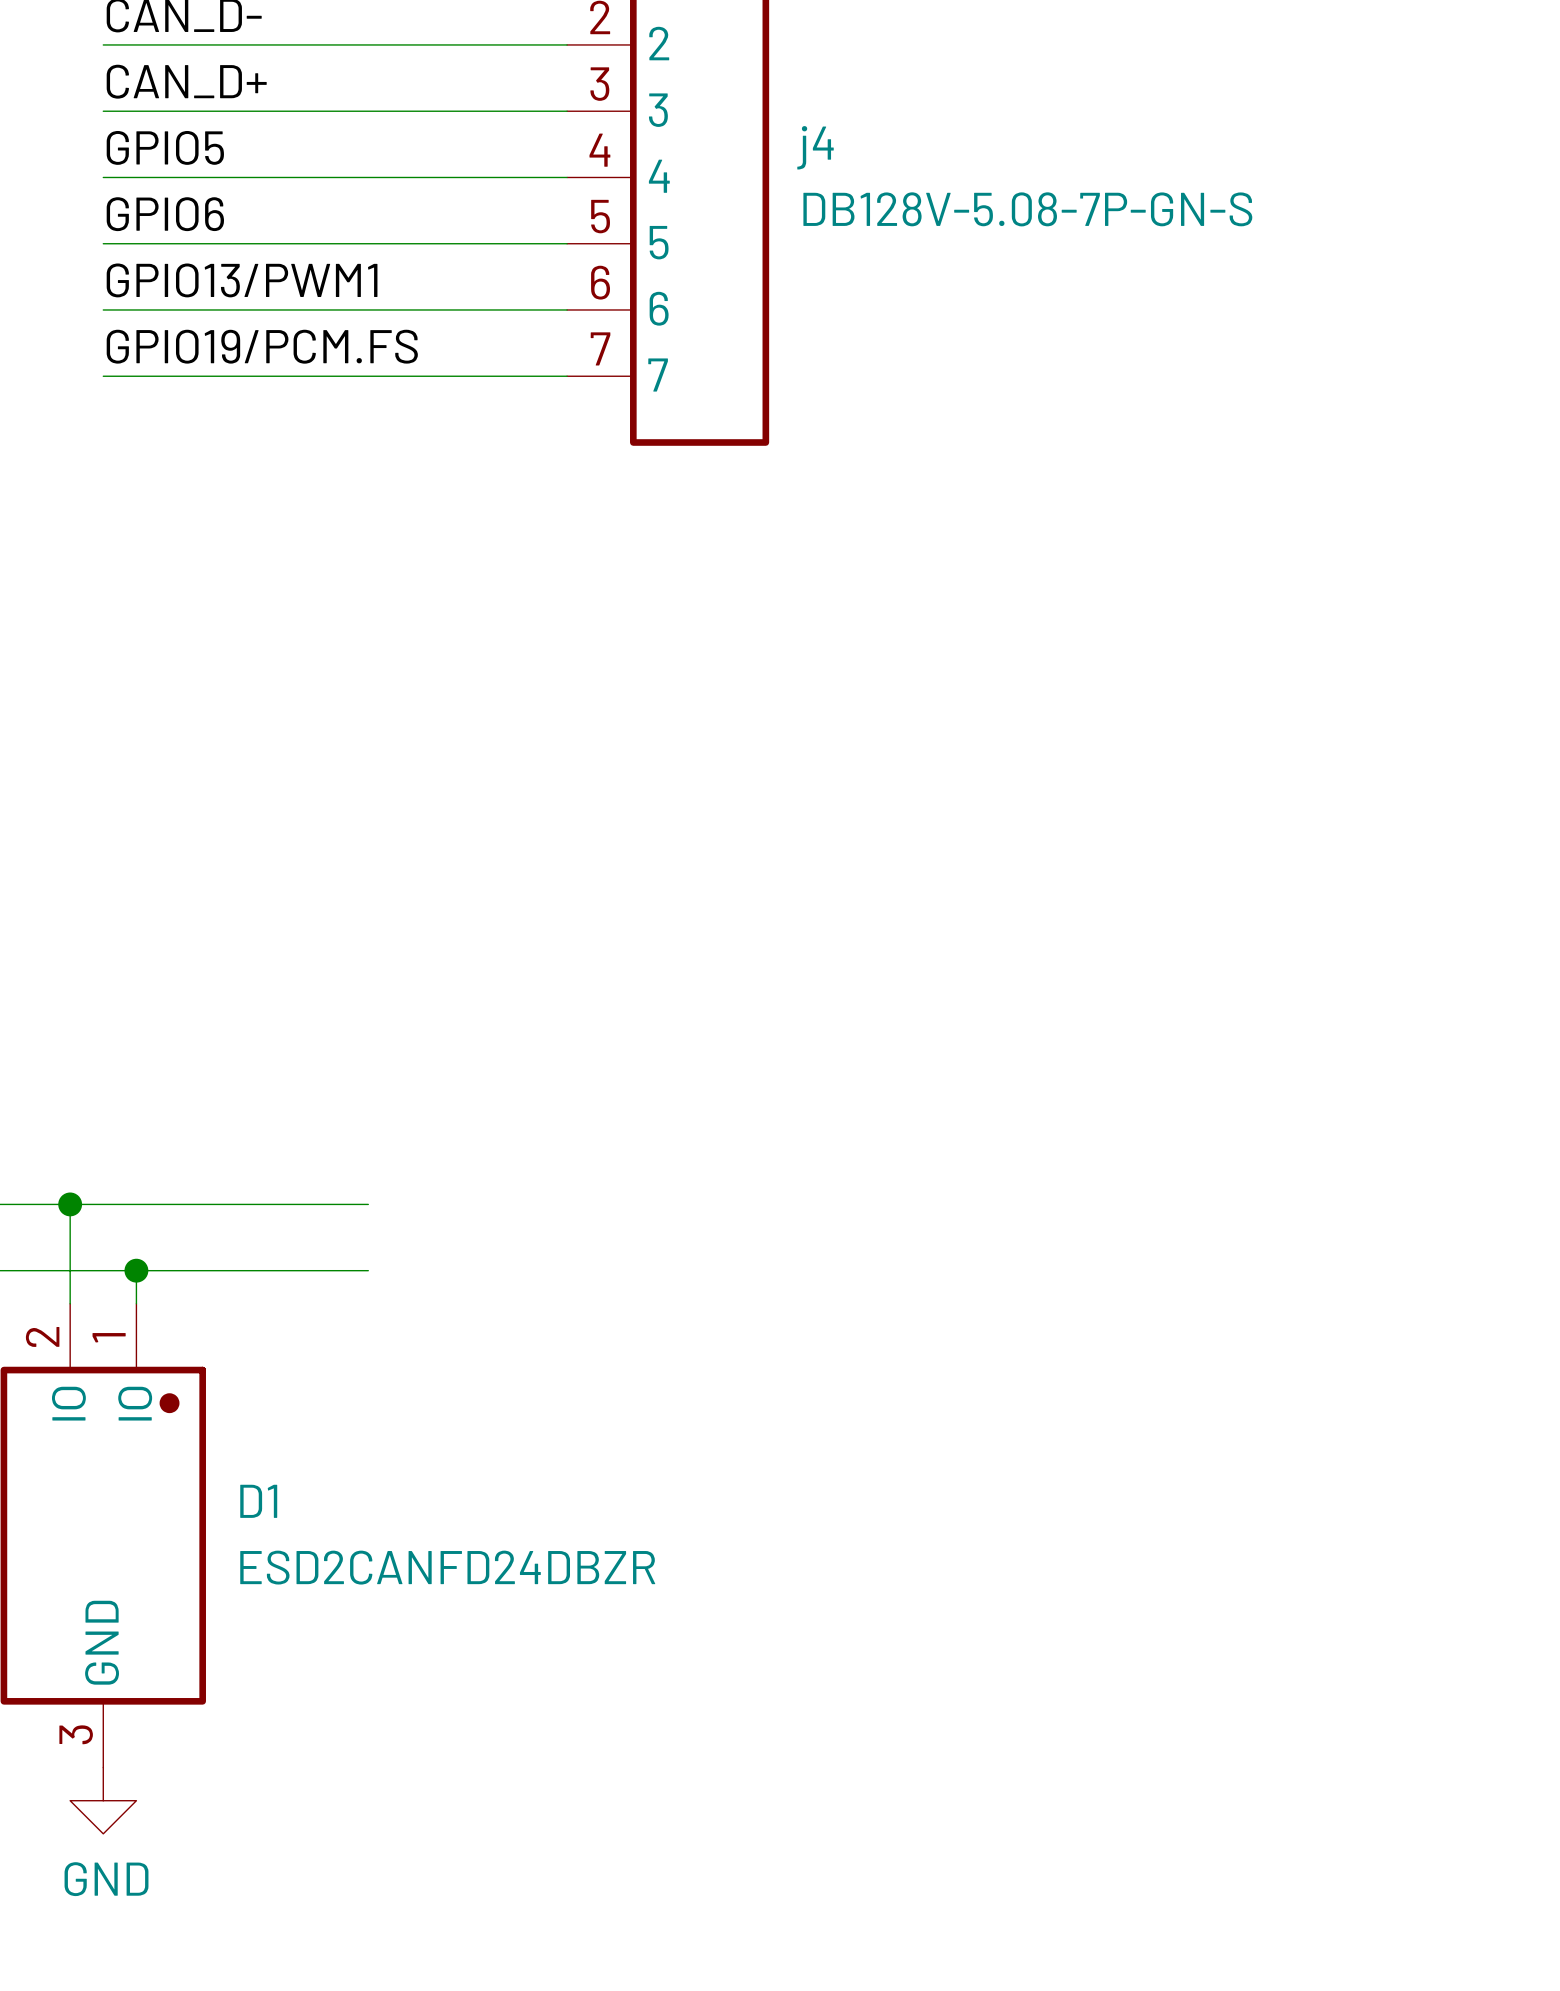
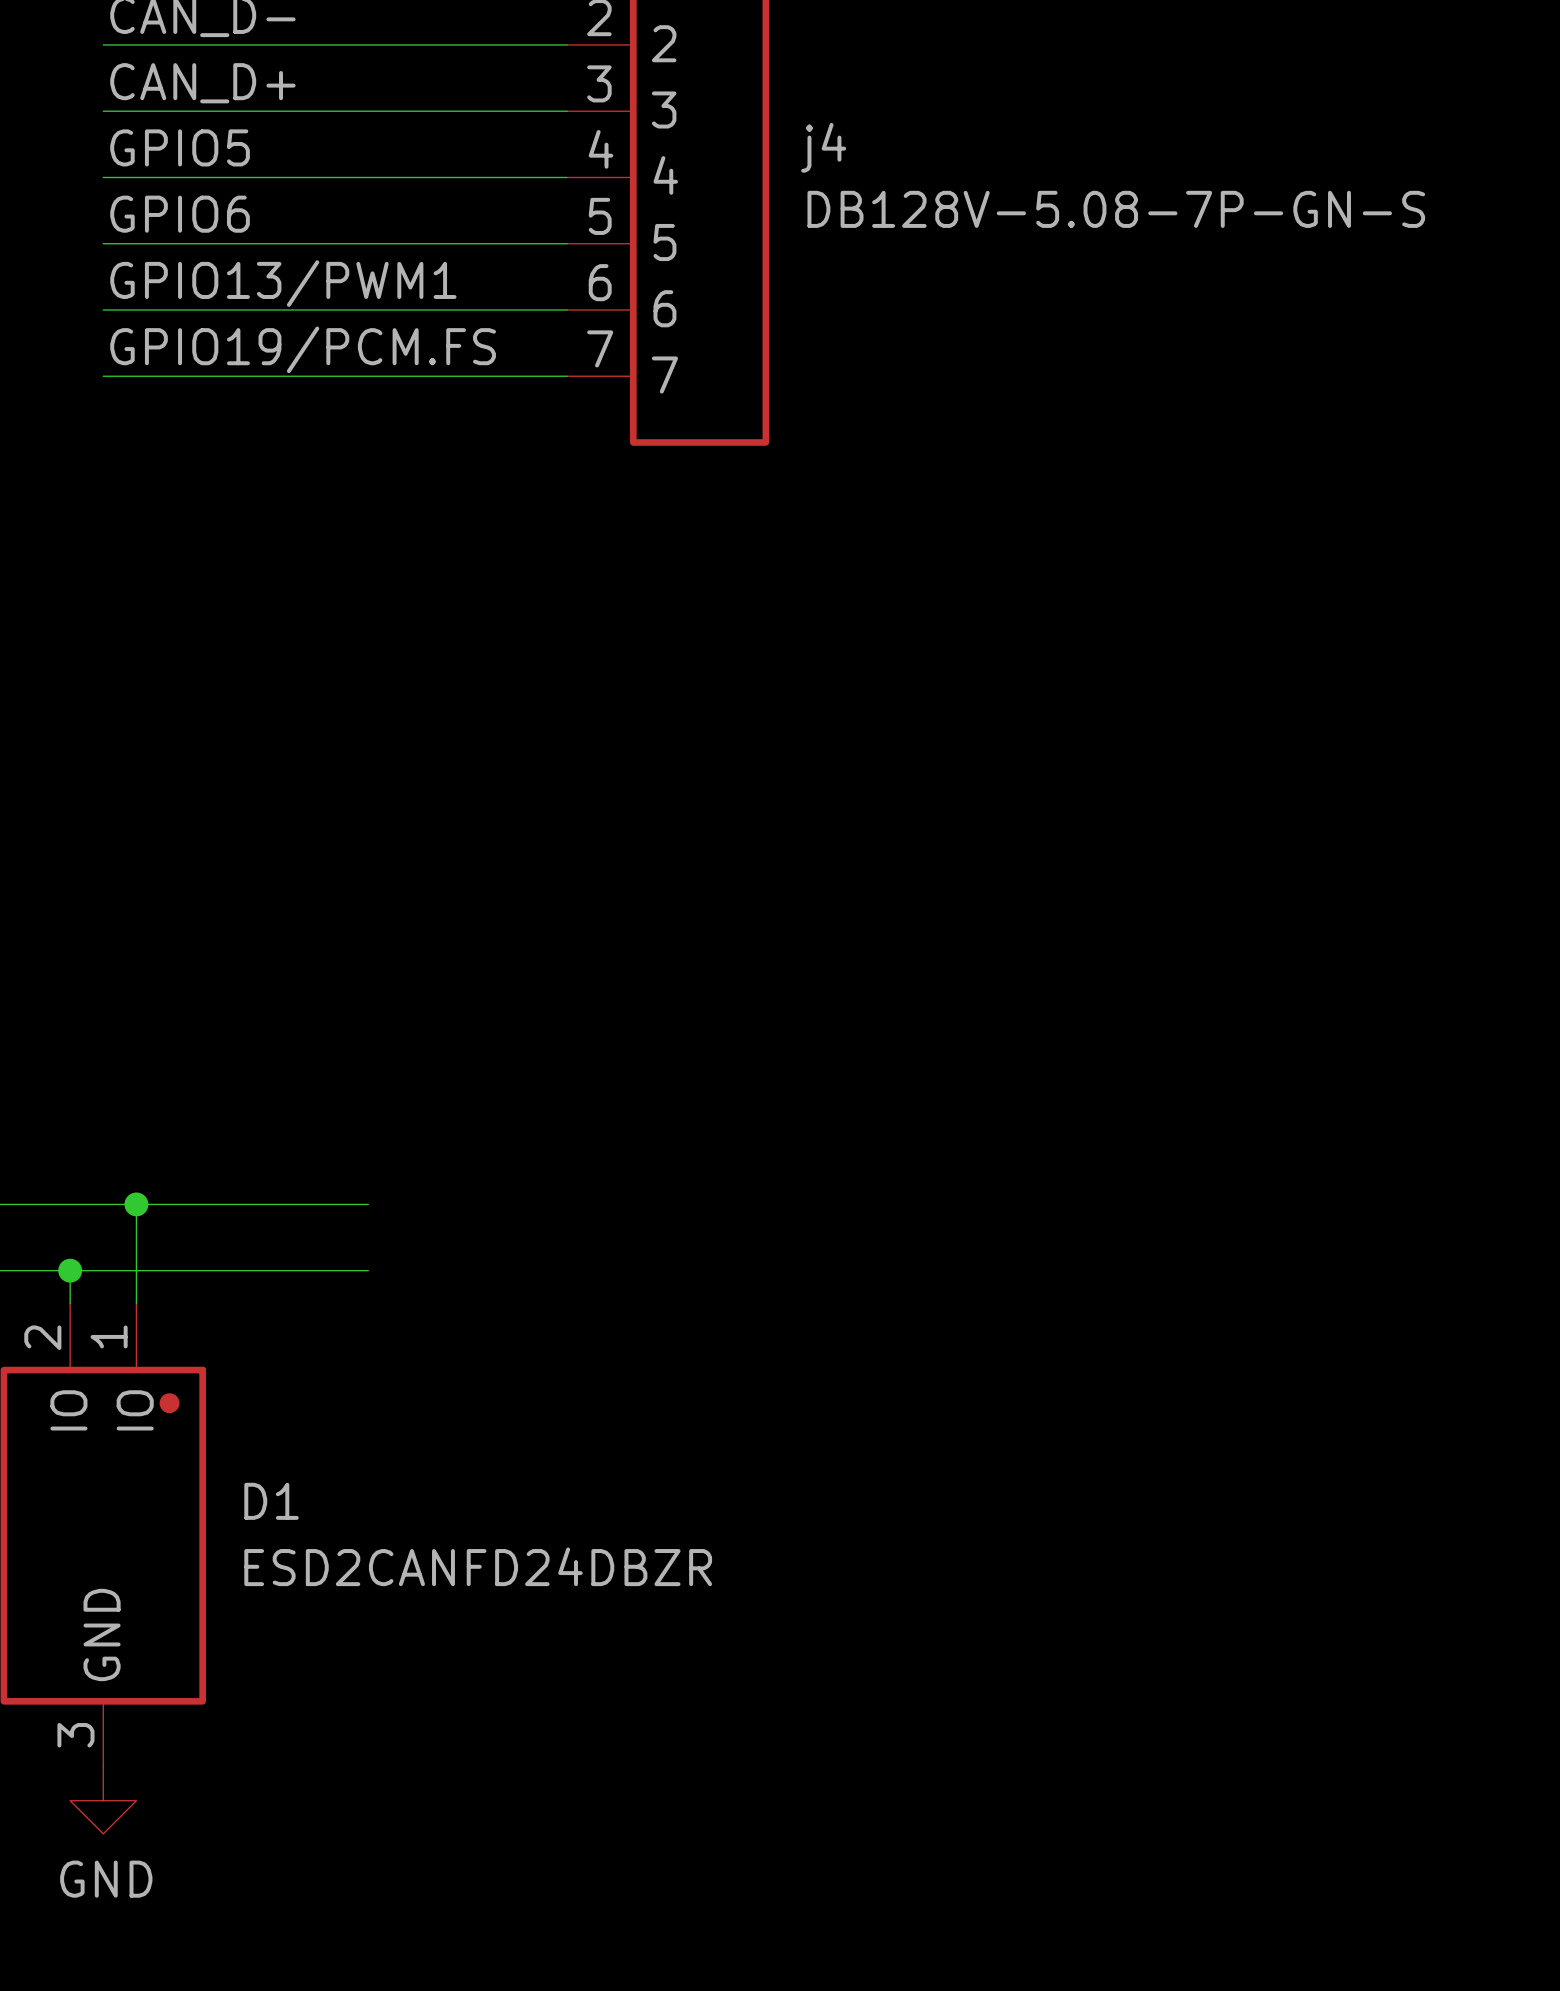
wire: (70, 1204) (70, 1270) -> (136, 1204) (136, 1270)
junction: (70, 1204) -> none
junction: none -> (136, 1204)
junction: none -> (70, 1270)
junction: (136, 1270) -> none

